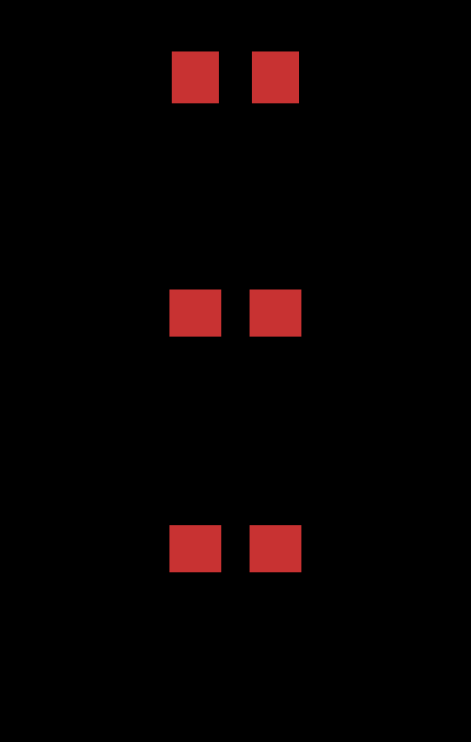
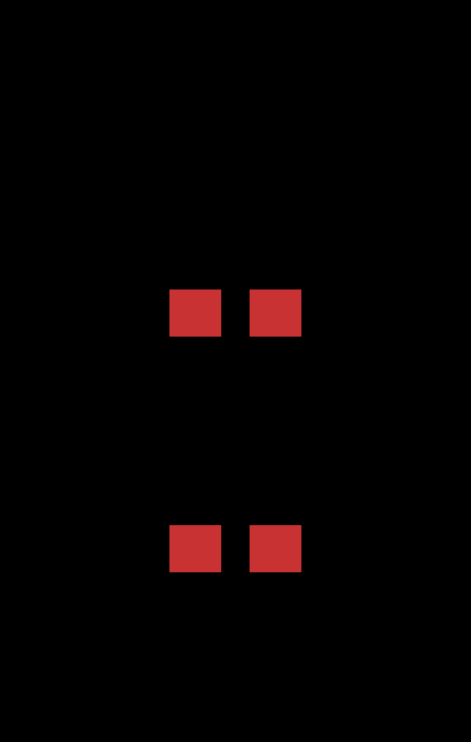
part: (235, 77) -> none

